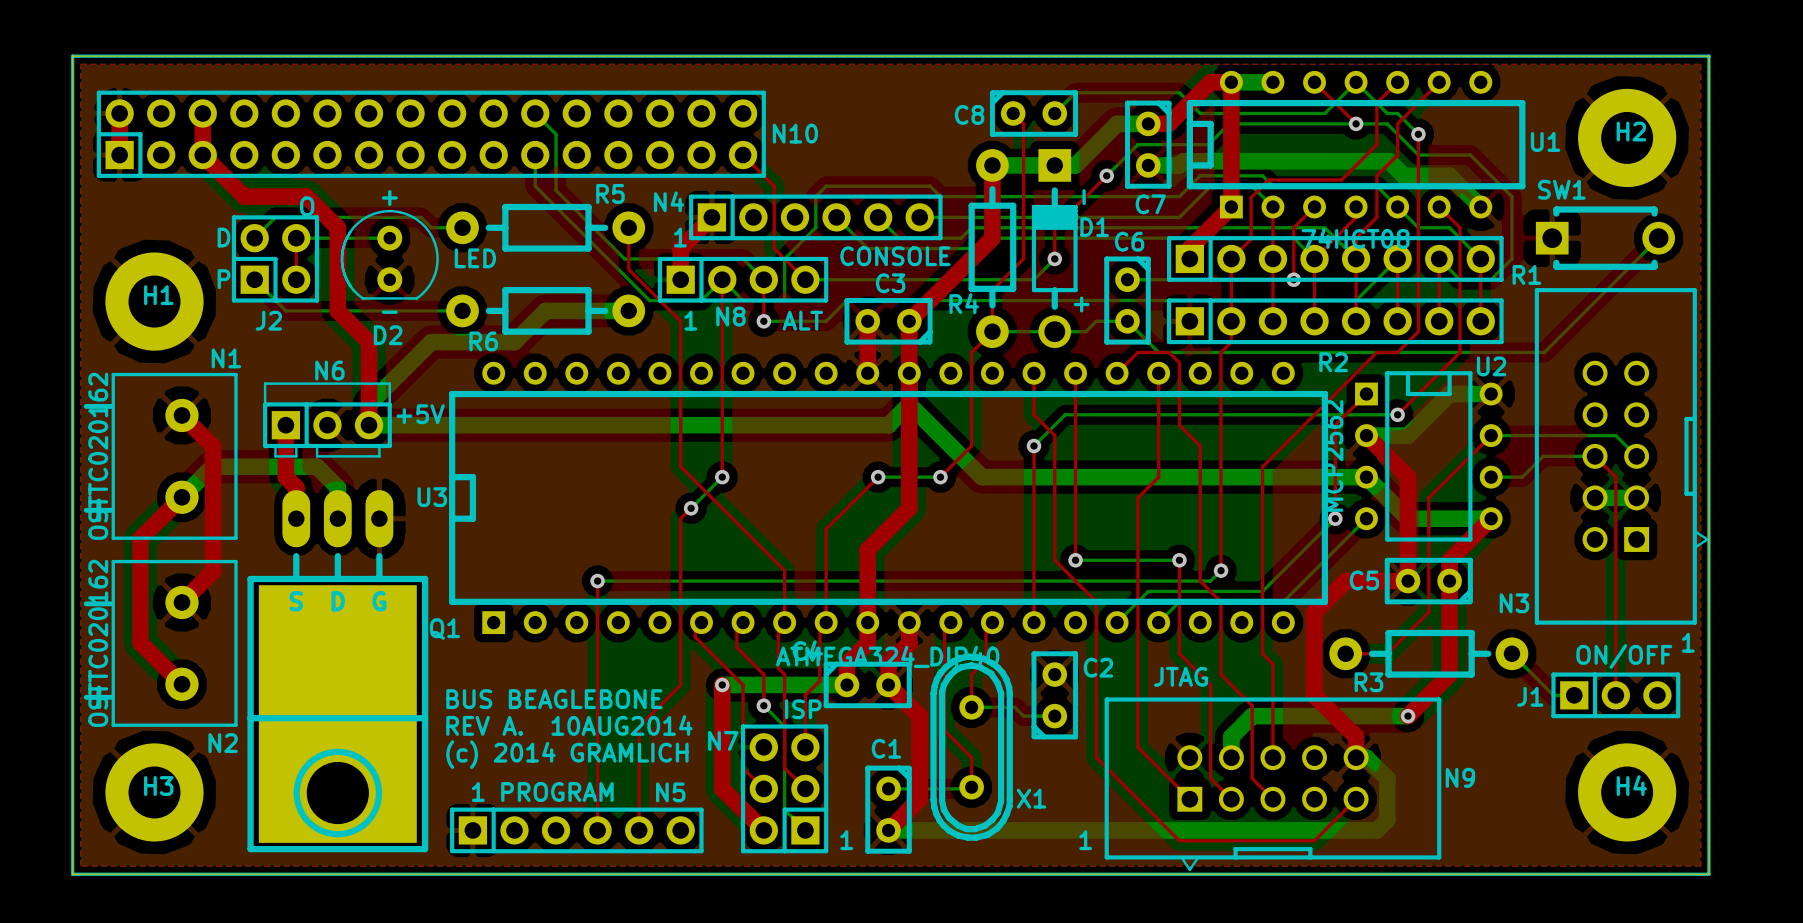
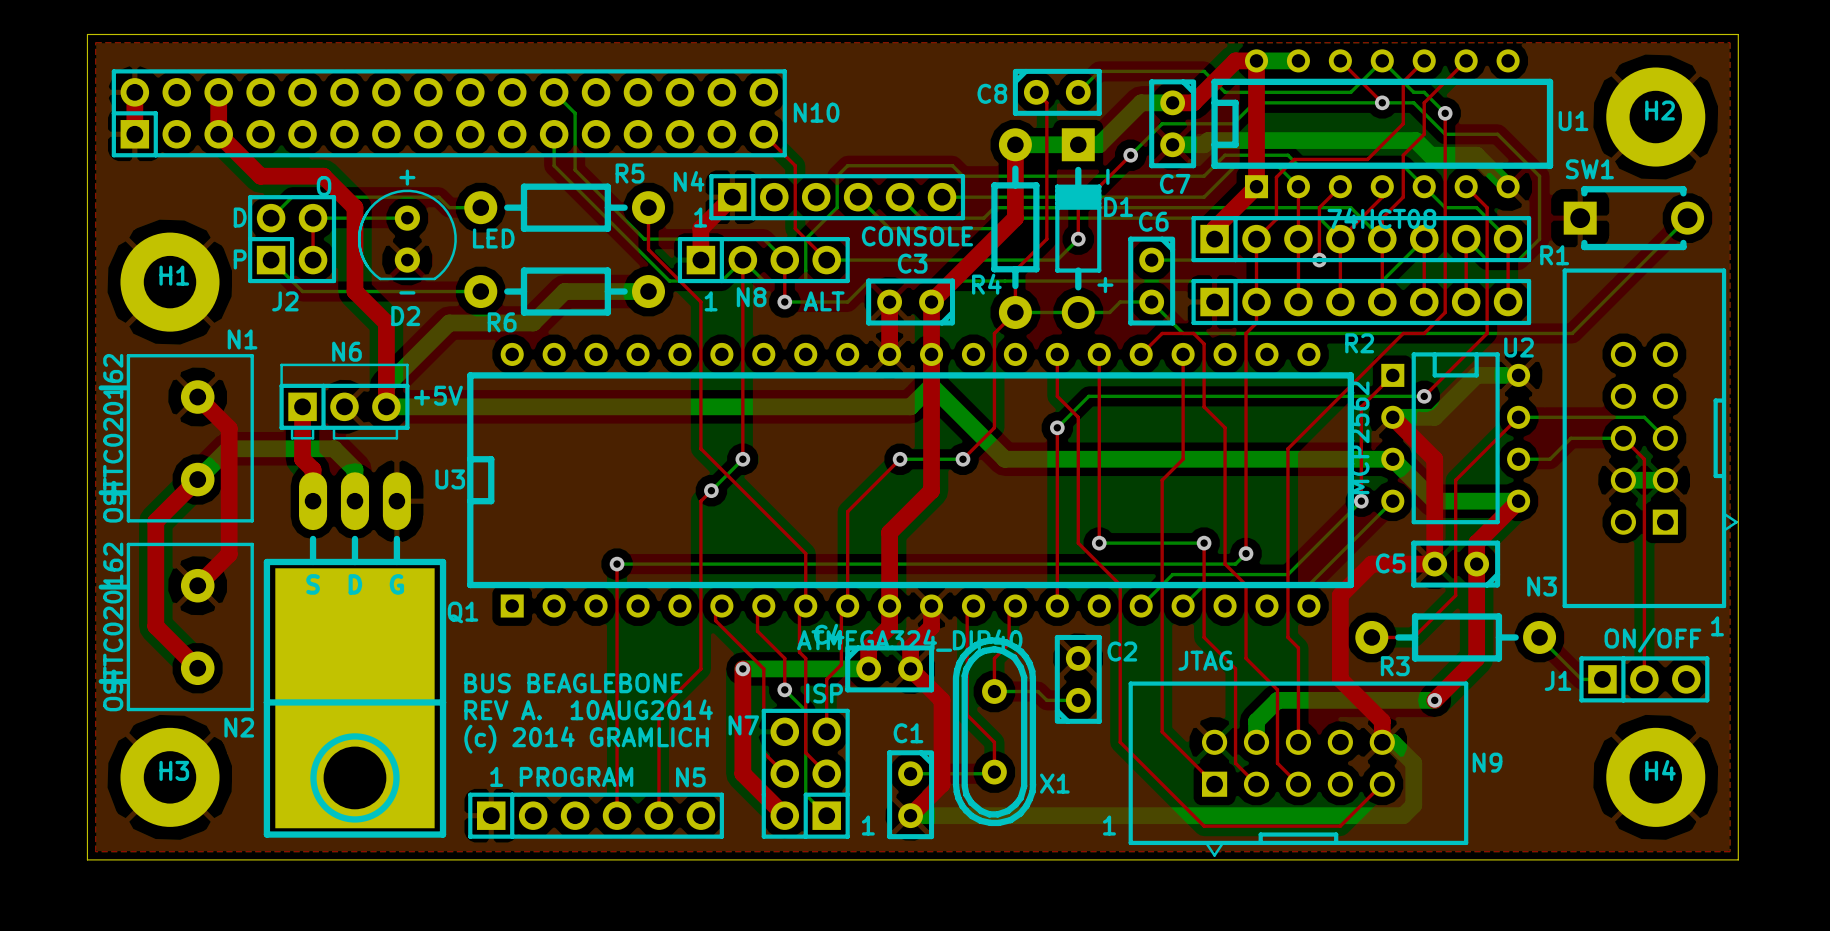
line: (72, 56) (72, 874) (1708, 874) (1708, 56) (72, 56) -> none

